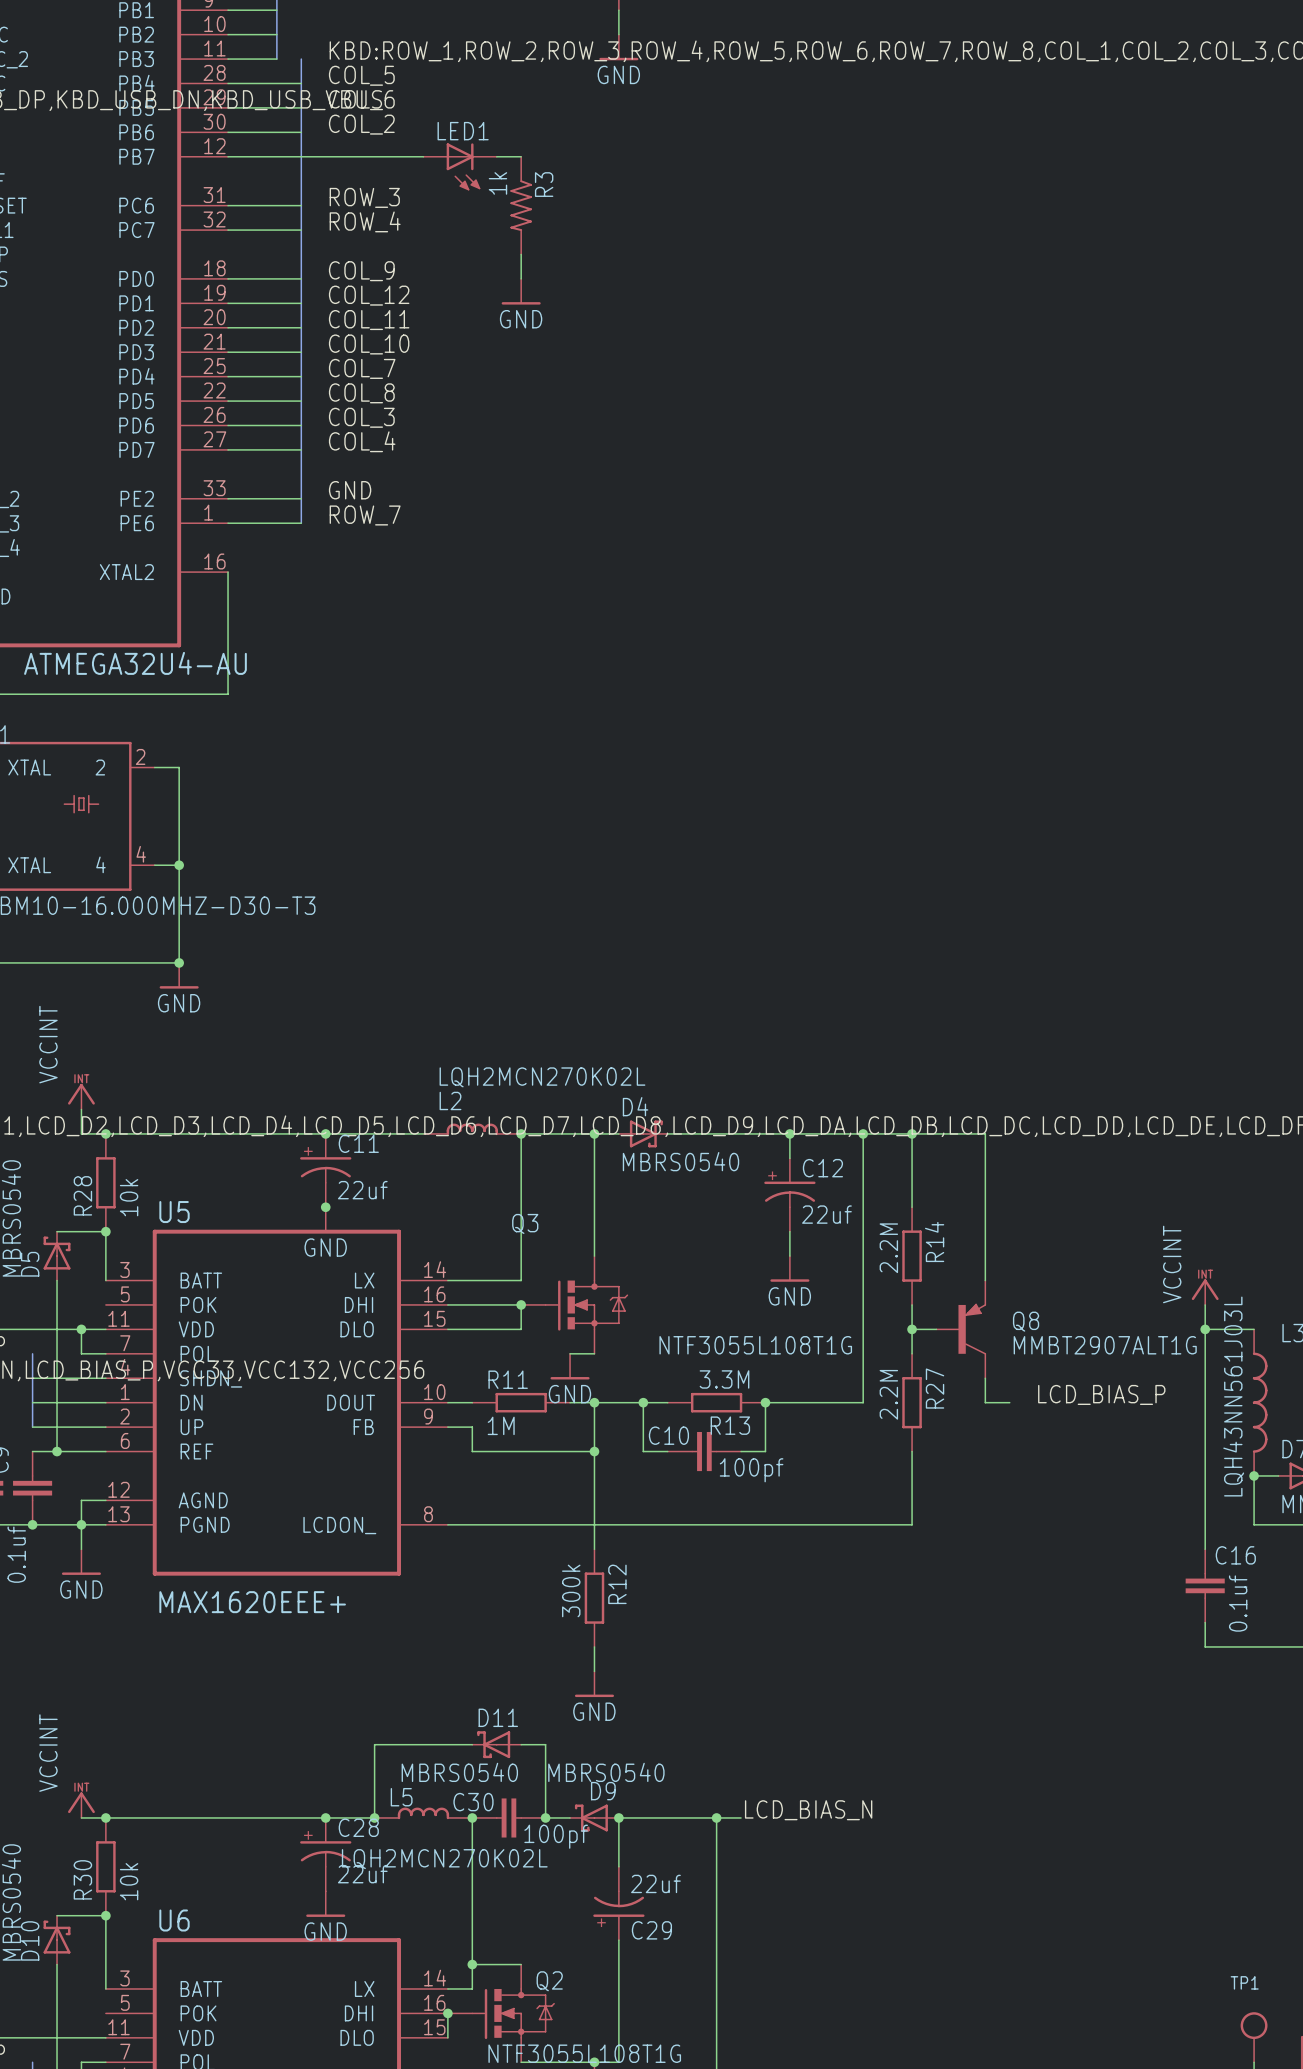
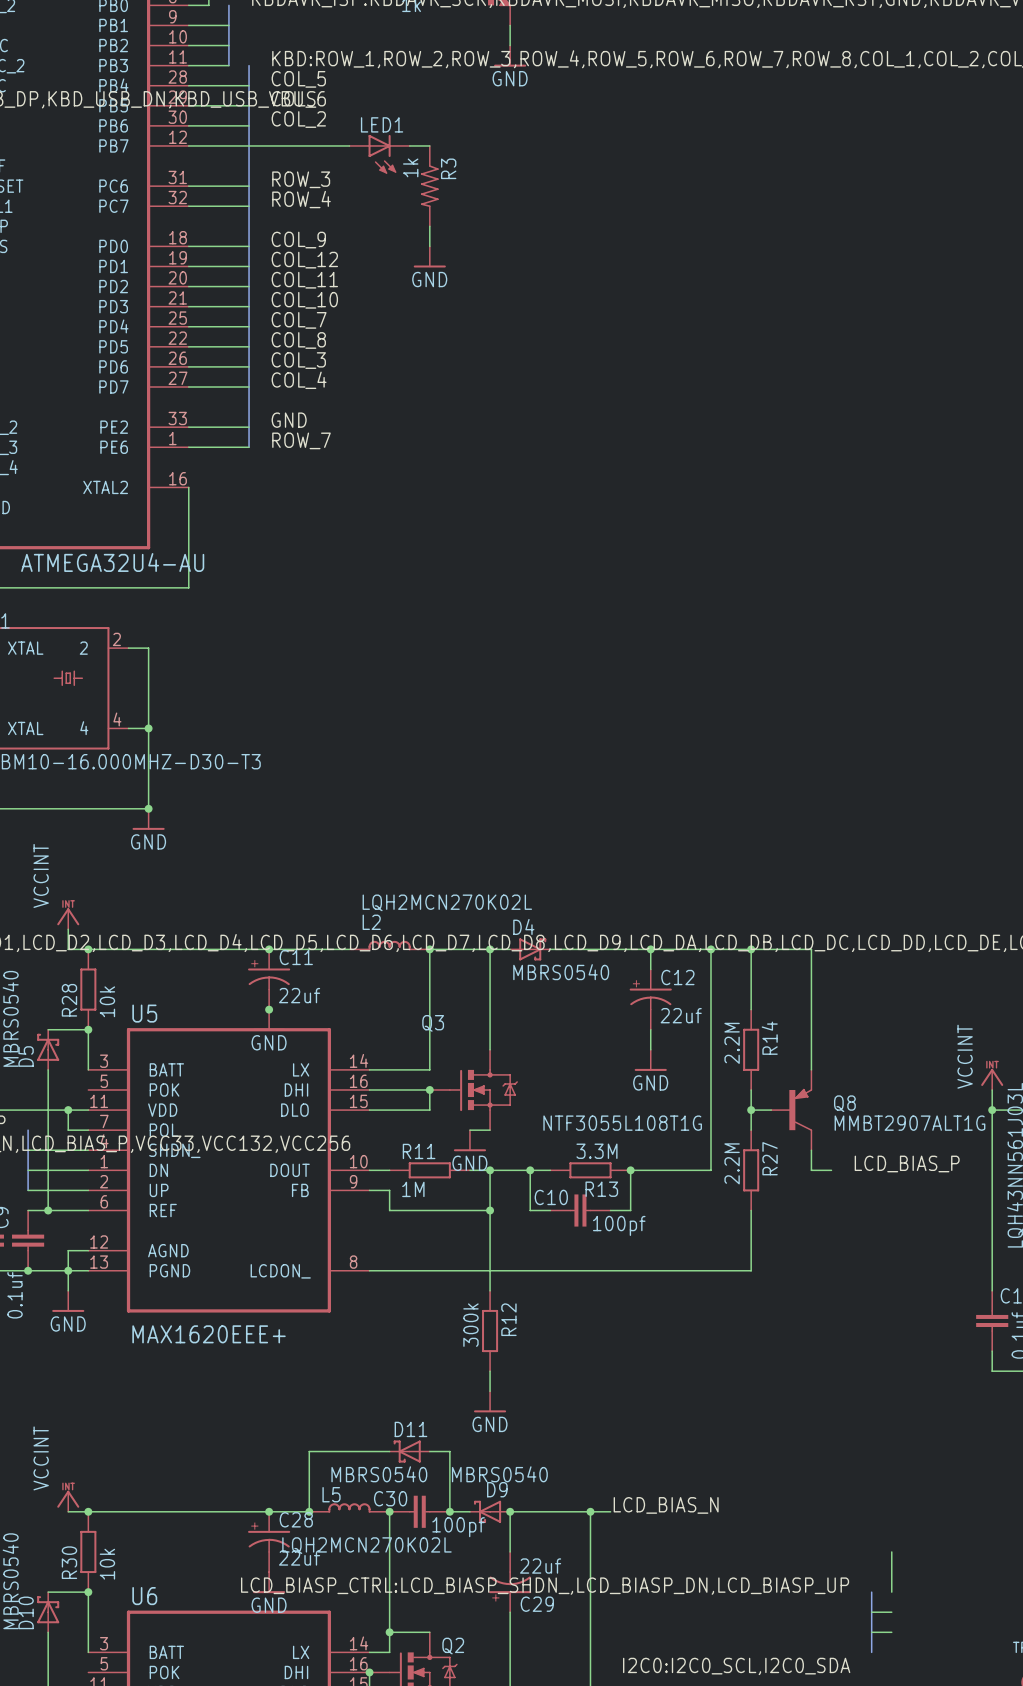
wire: none -> (891, 1551) (891, 1592)
label: none -> LCD_BIASP_CTRL:LCD_BIASP_SHDN_,LCD_BIASP_DN,LCD_BIASP_UP (545, 1586)
bus: none -> (871, 1592) (871, 1652)
wire: none -> (871, 1612) (891, 1612)
wire: none -> (871, 1632) (891, 1632)
label: none -> I2C0:I2C0_SCL,I2C0_SDA (736, 1666)

